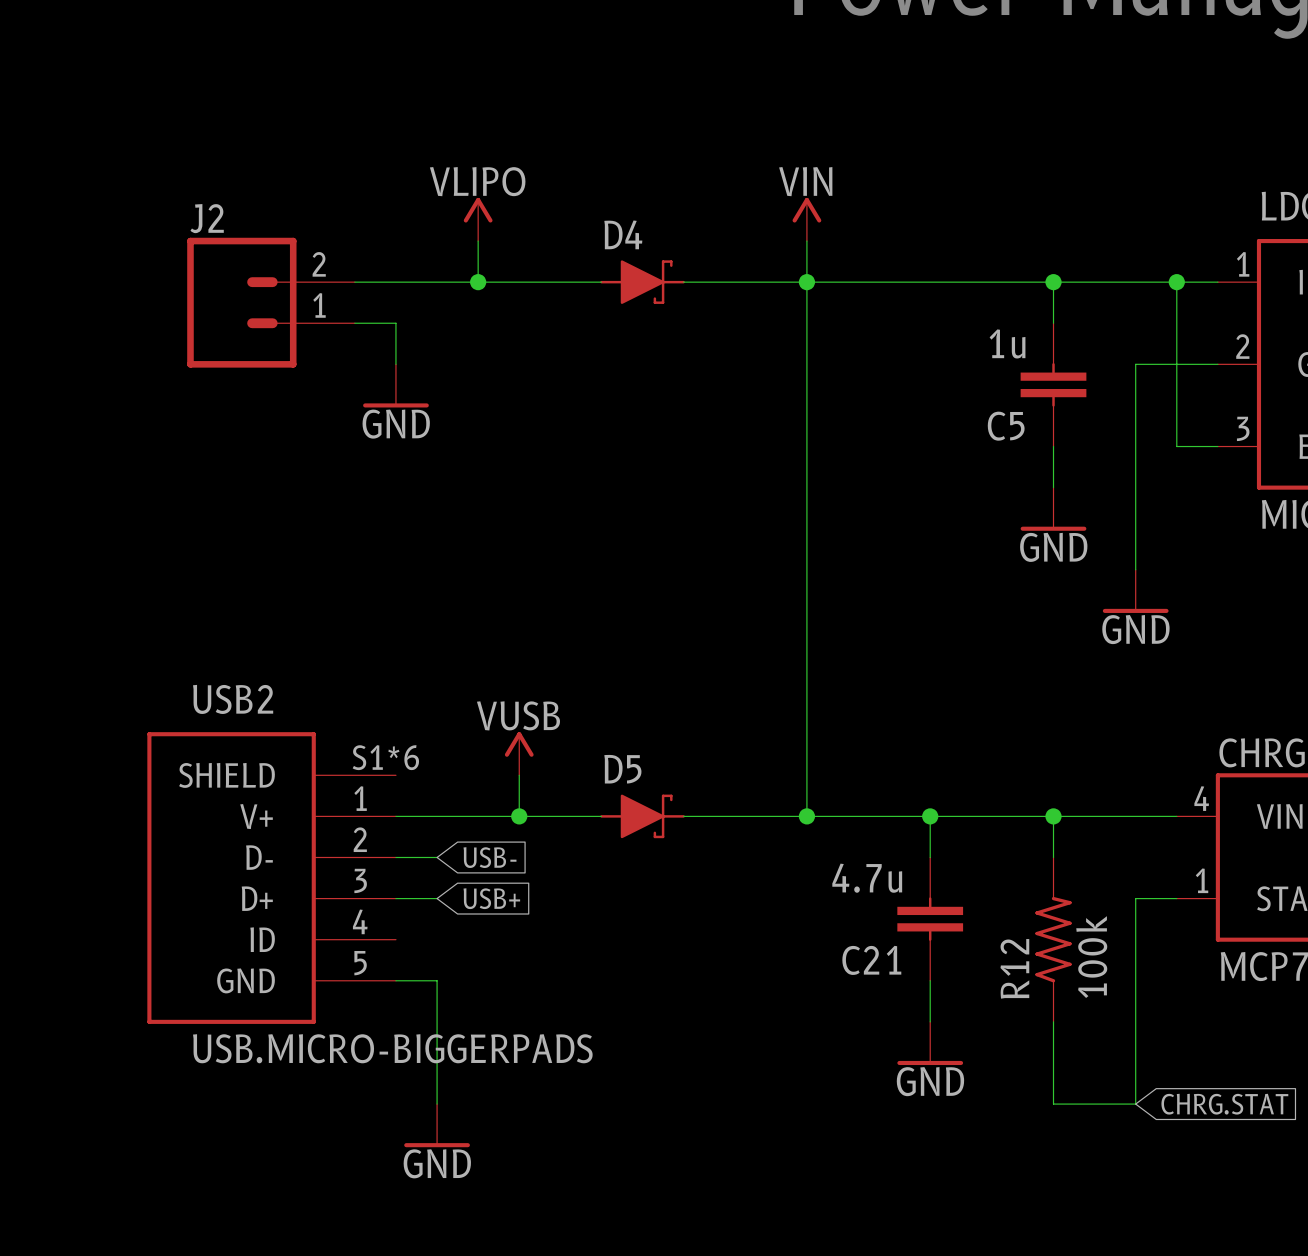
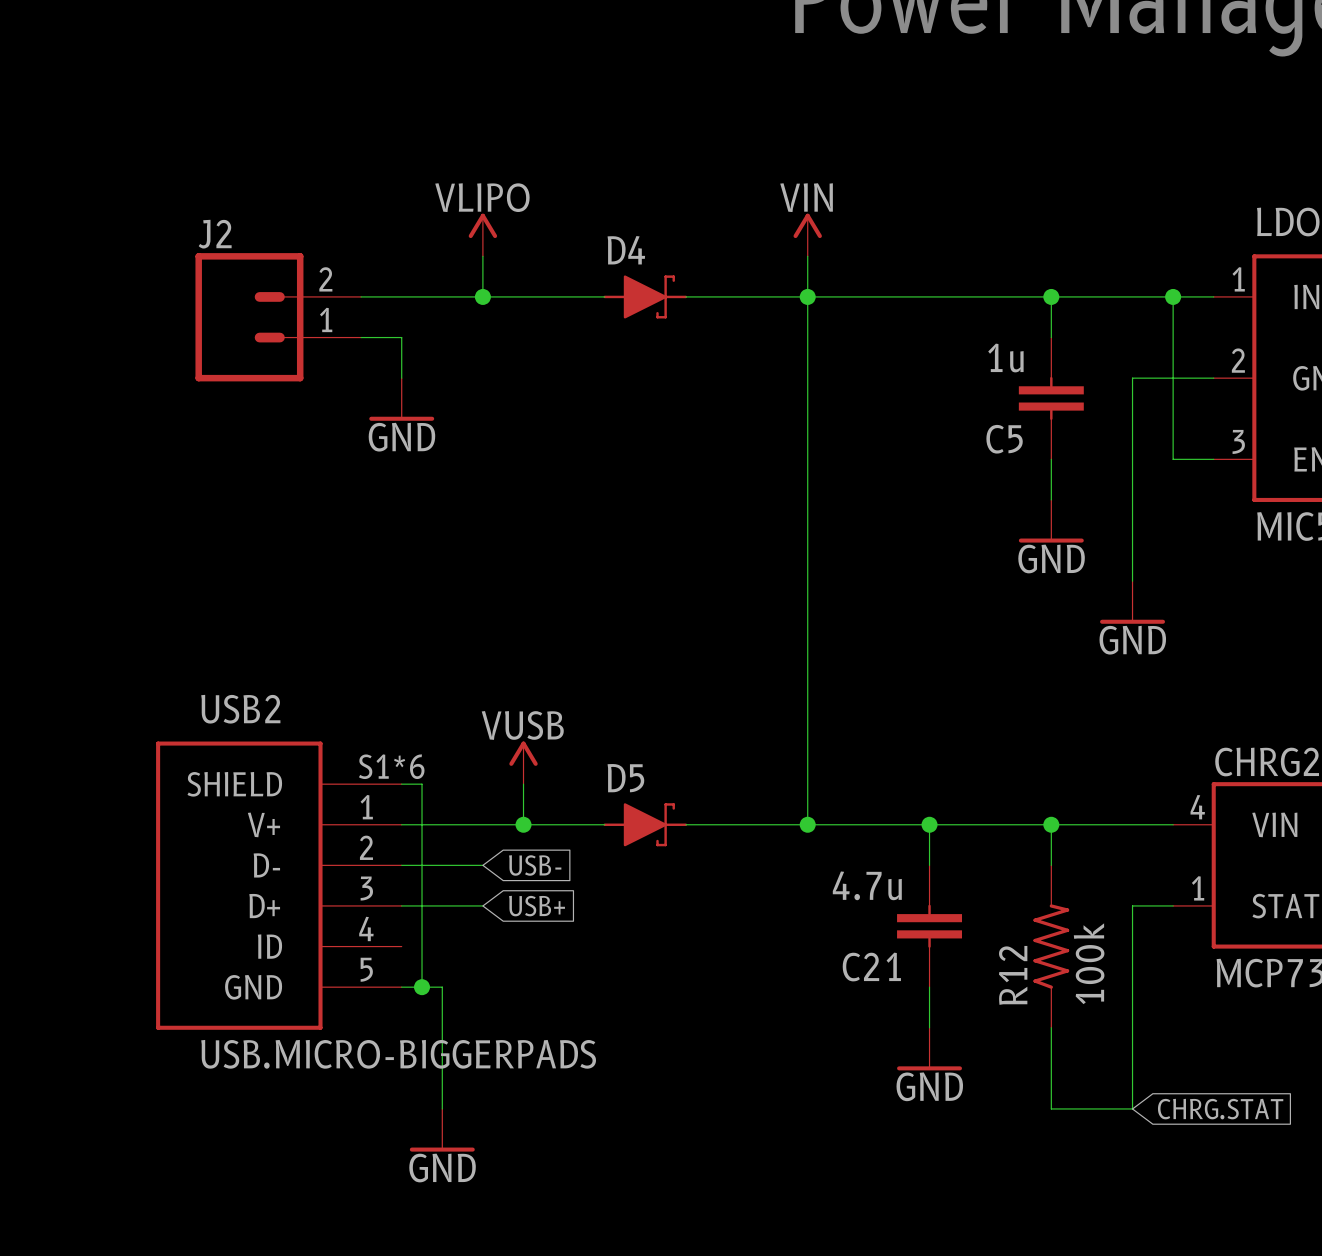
wire: none -> (401, 784) (422, 784) (422, 987)
wire: none -> (442, 865) (482, 865)
global label position: USB- (490, 857) -> USB- (535, 865)
wire: none -> (442, 905) (482, 905)
global label position: USB+ (491, 898) -> USB+ (537, 906)
junction: none -> (422, 987)

